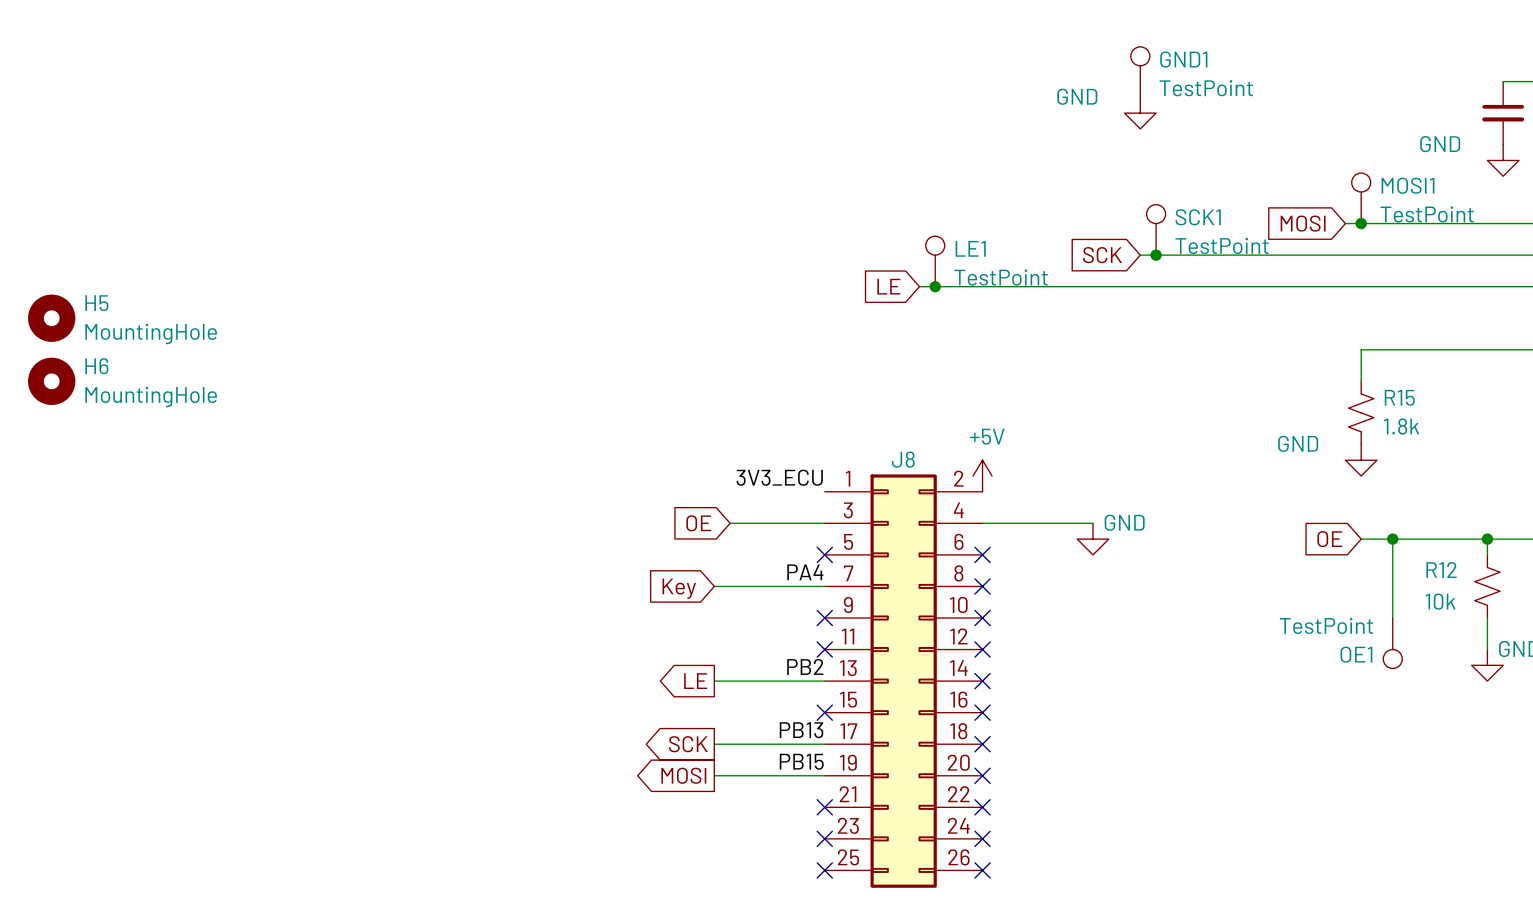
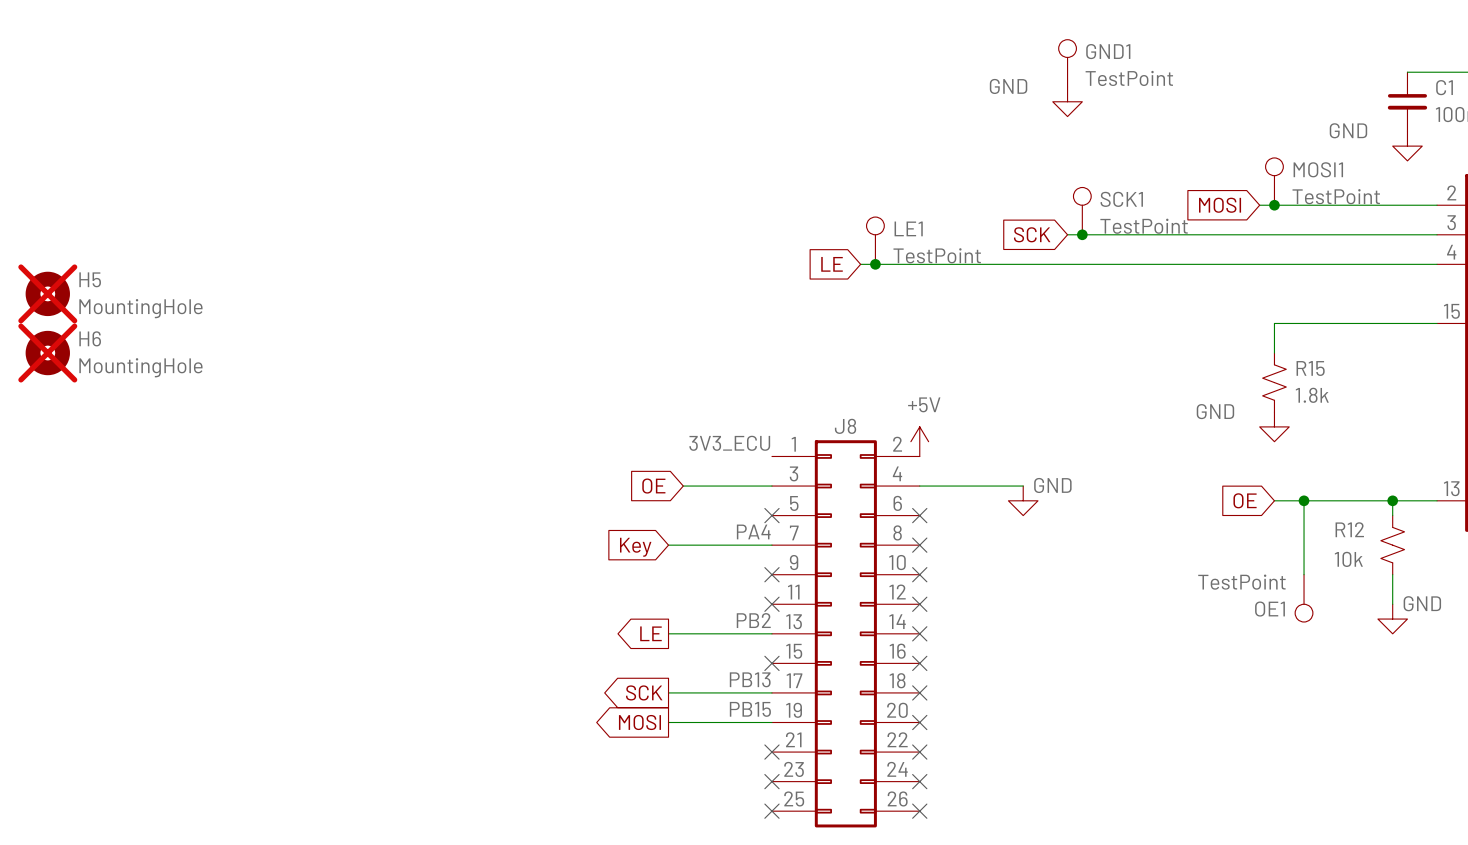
H5 do-not-place cross: none -> (47, 293)
H6 do-not-place cross: none -> (47, 353)

